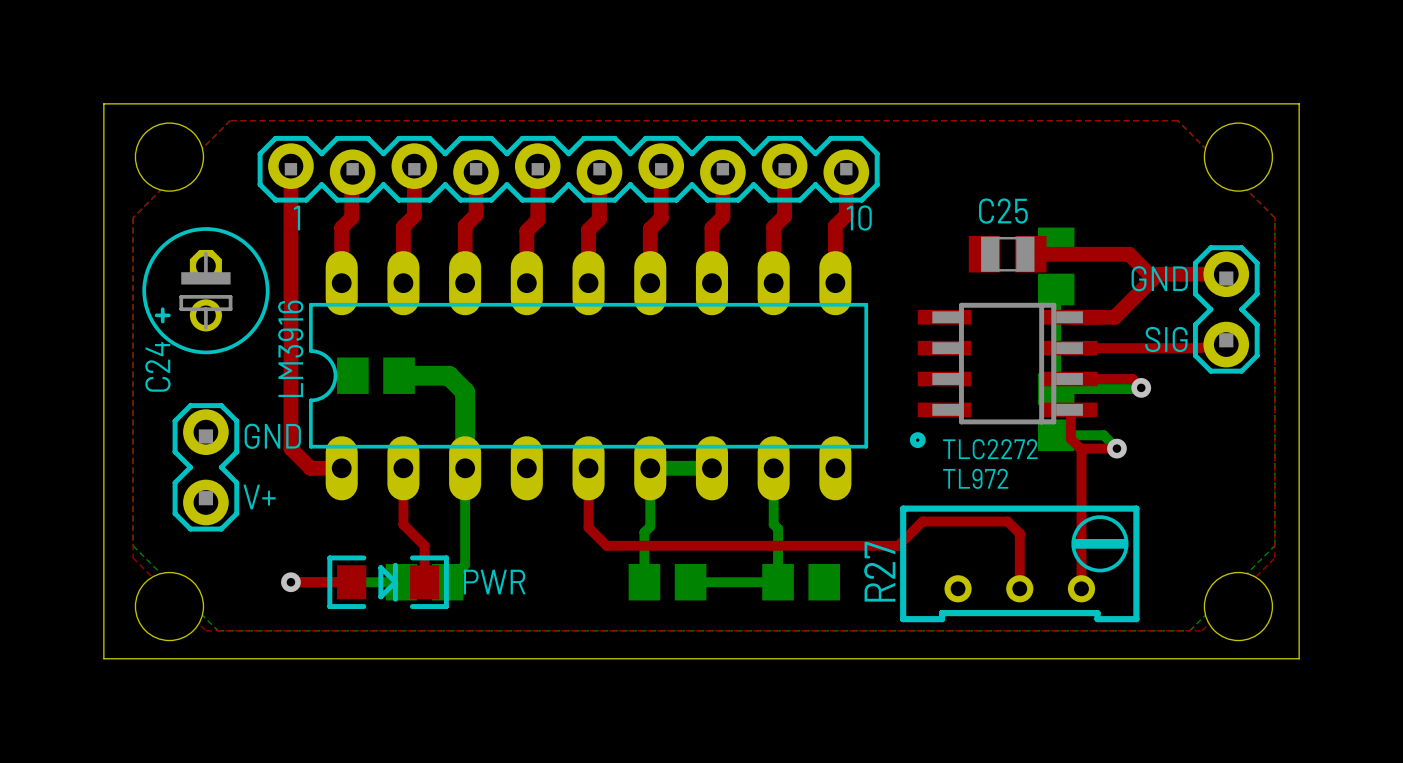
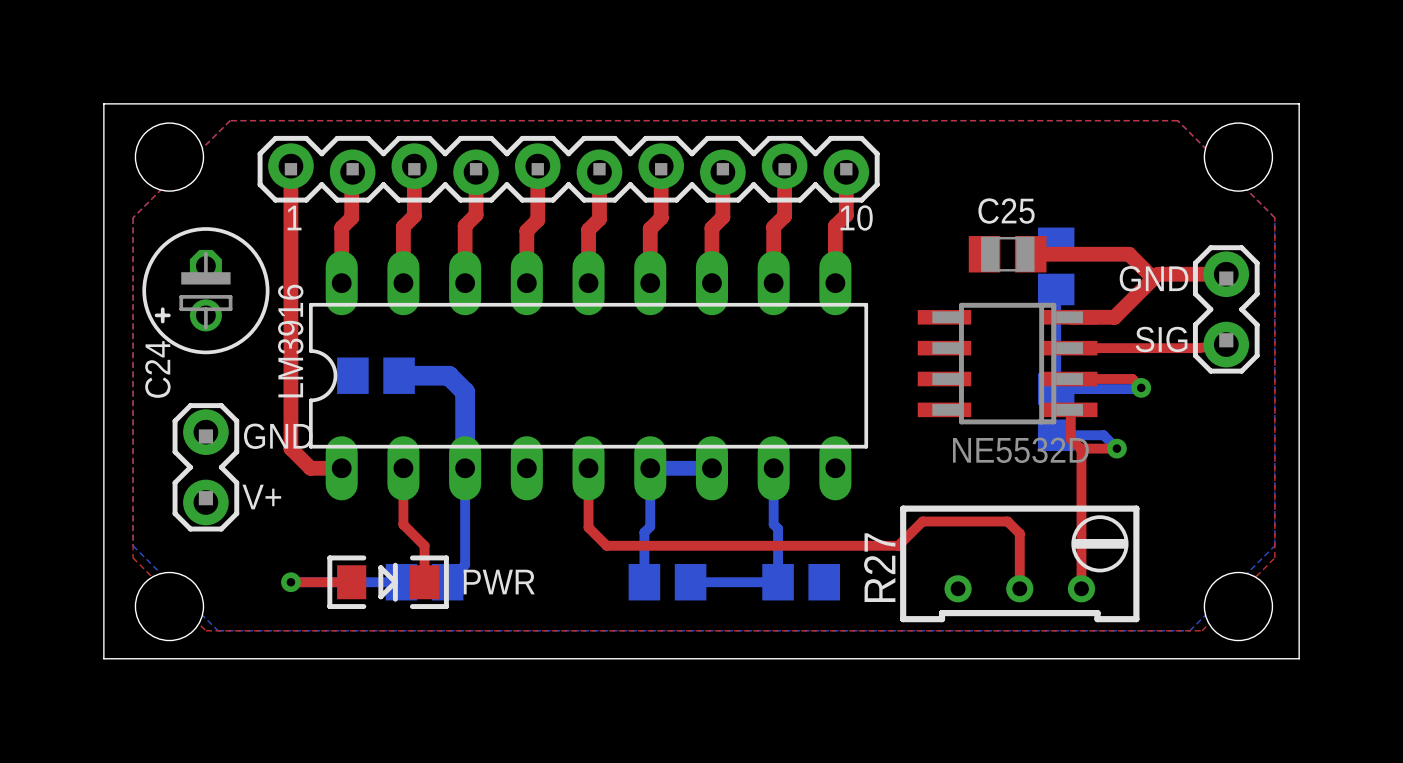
drawing: [909, 432, 926, 449] -> none
text: TLC2272 (990, 449) -> none
part value: none -> NE5532D (1020, 450)
text: TL972 (975, 478) -> none

